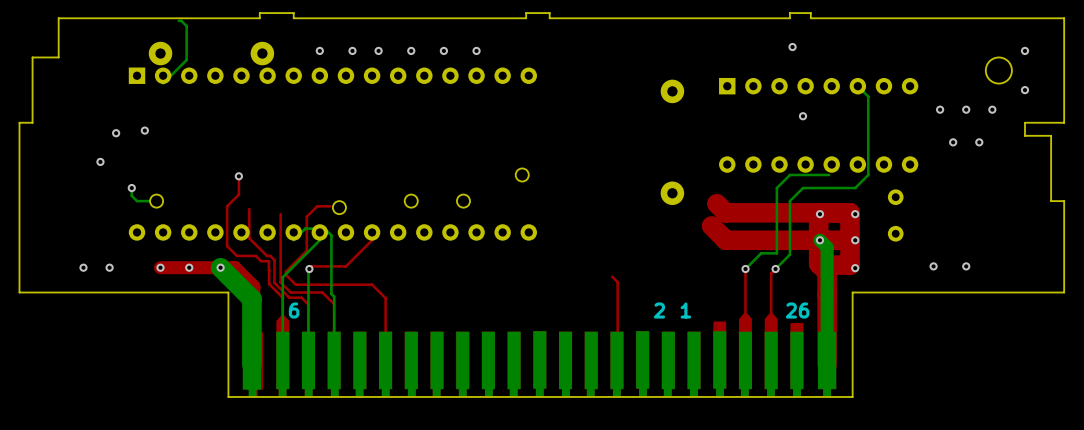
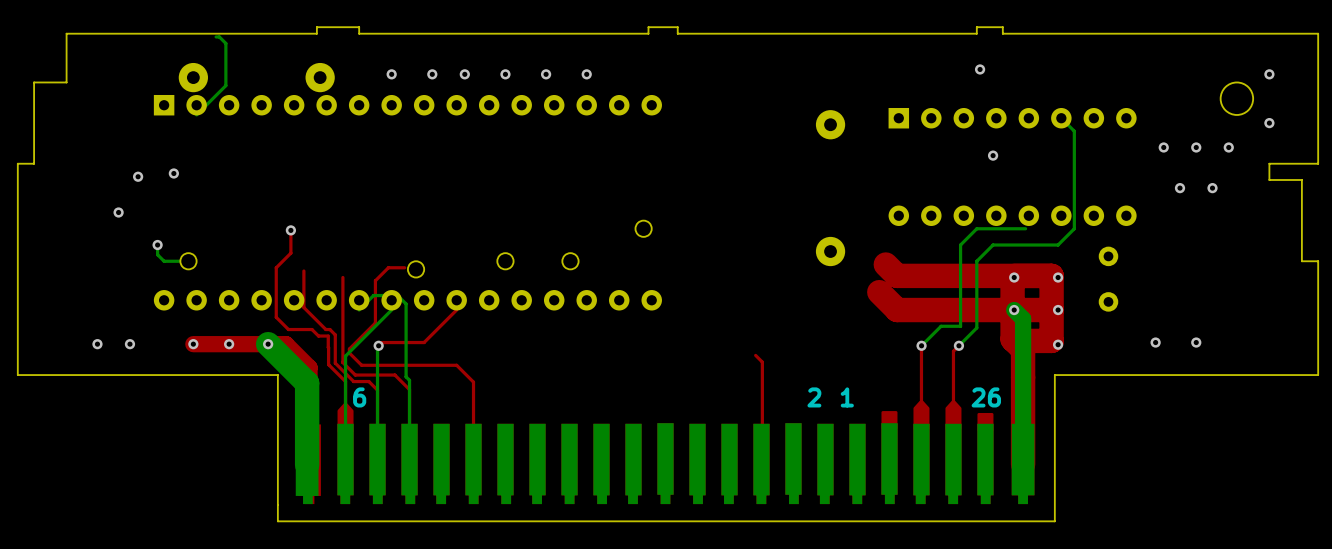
board edge: (852, 396) (228, 396) -> (1054, 505) (1054, 521) (277, 521) (277, 505)

